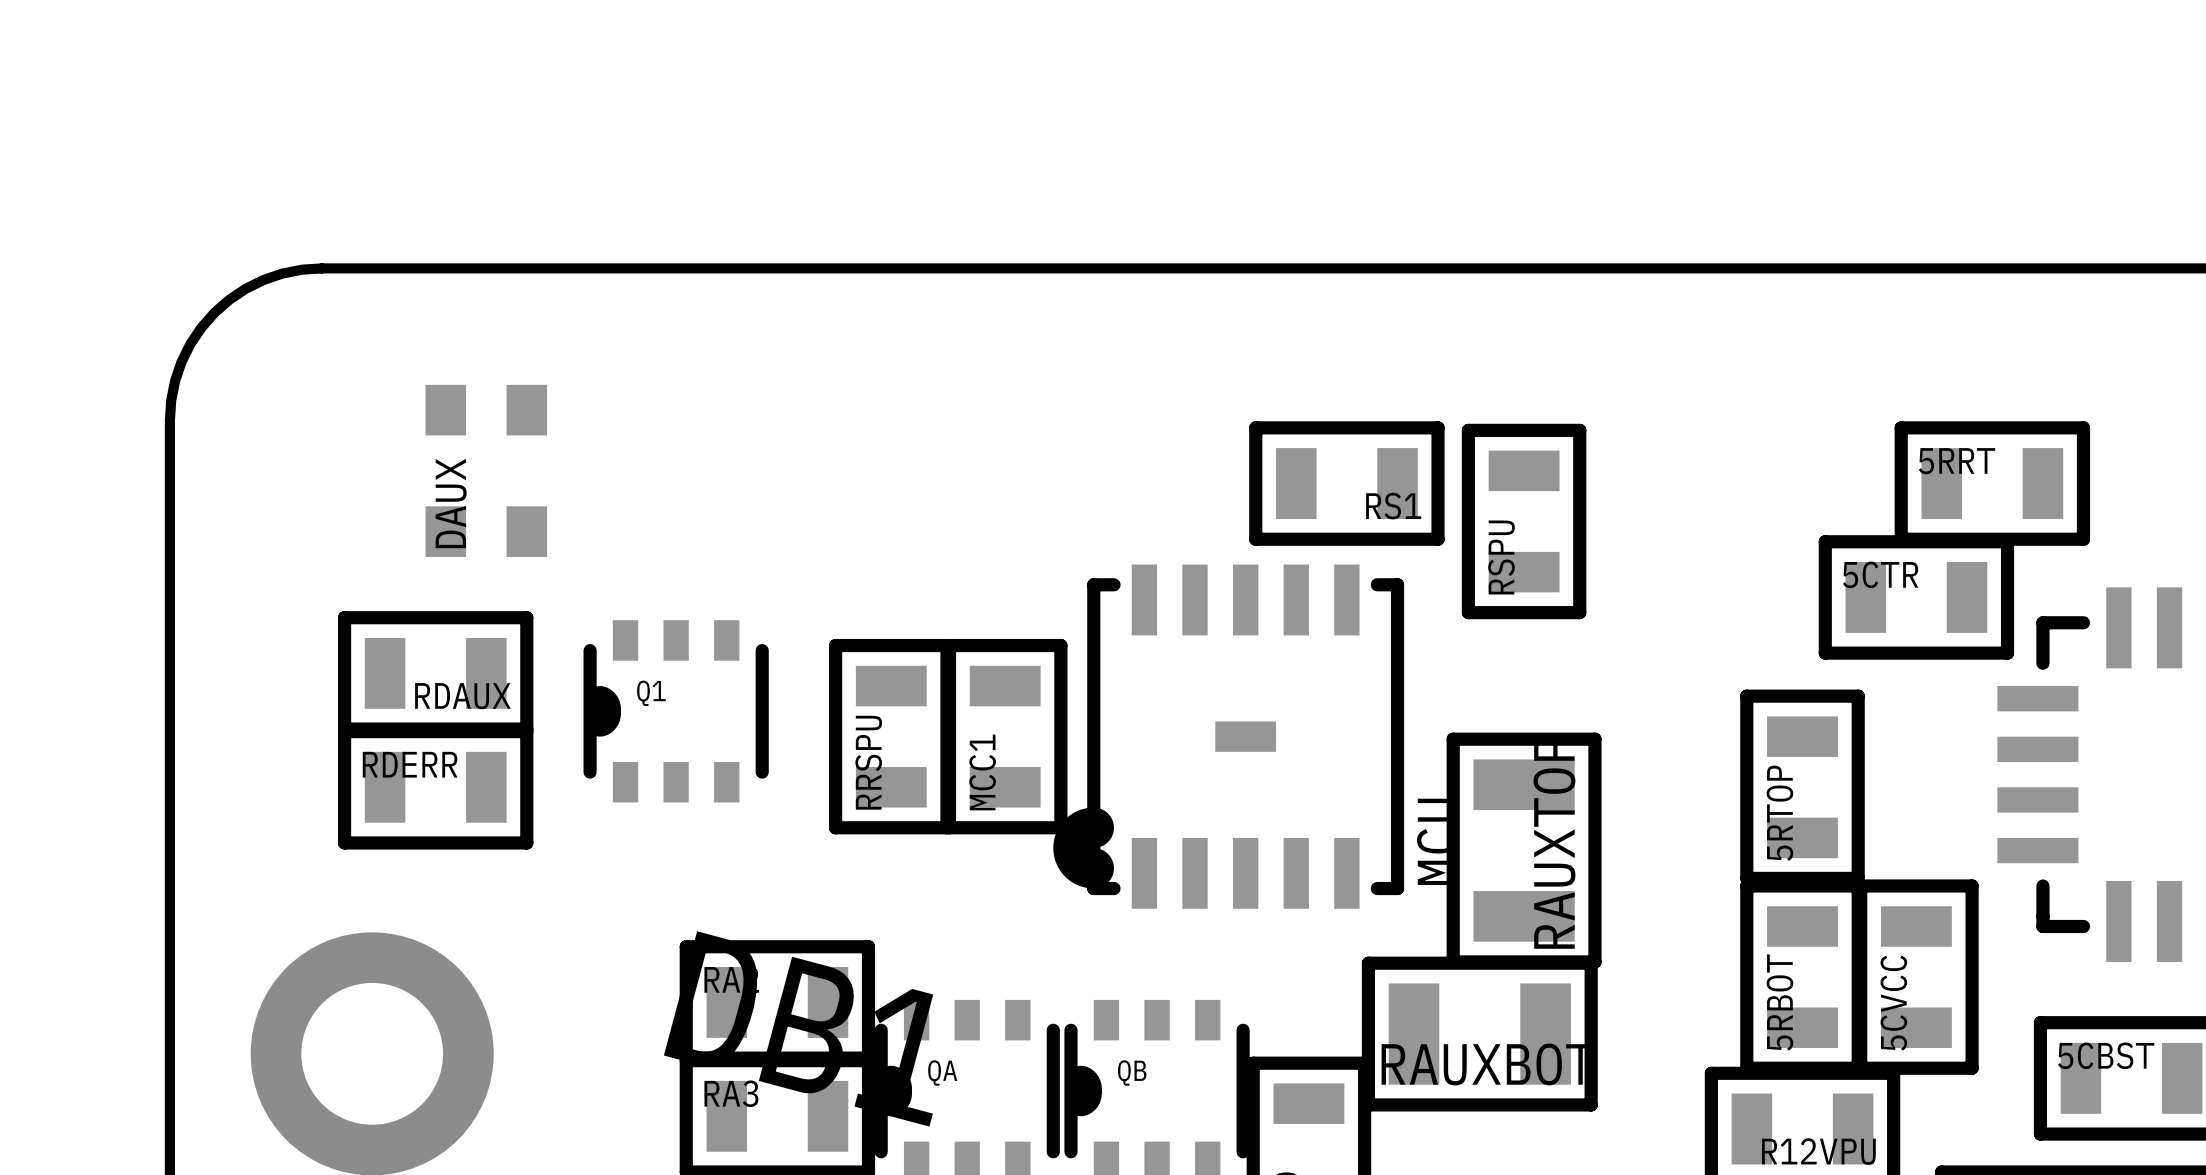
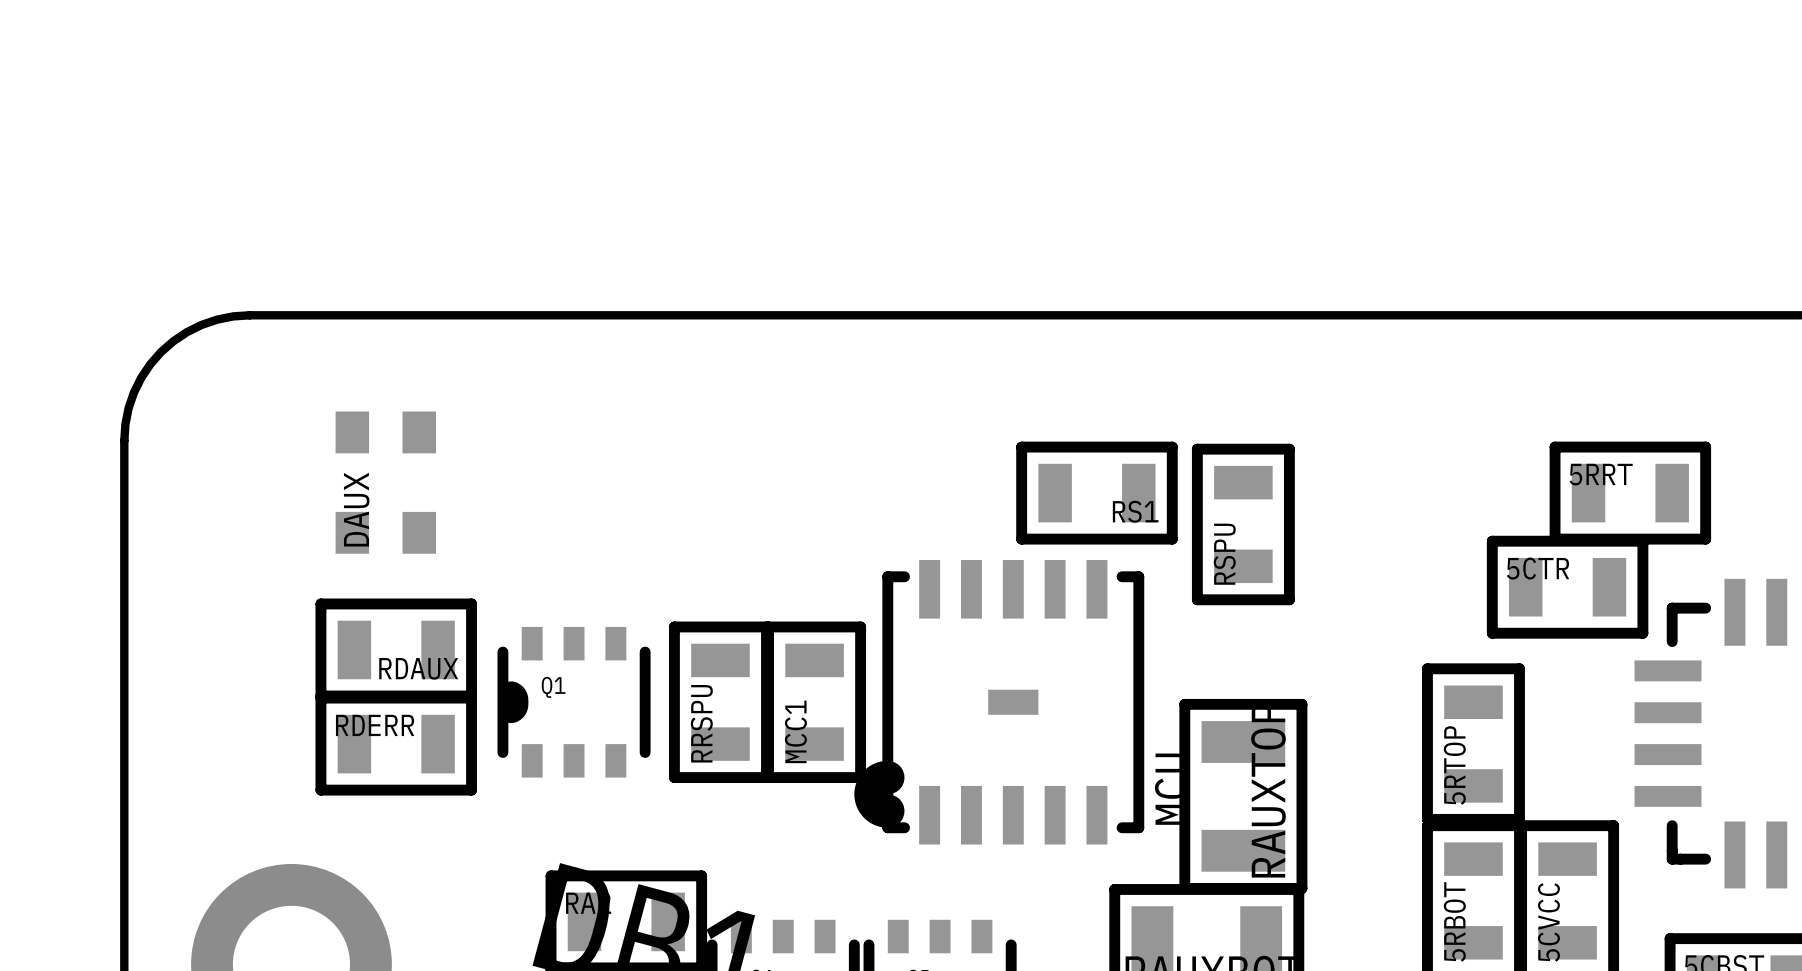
RDAUX position: (435, 673) -> (396, 649)
Q1 position: (676, 711) -> (574, 702)
RDERR position: (435, 787) -> (396, 744)

